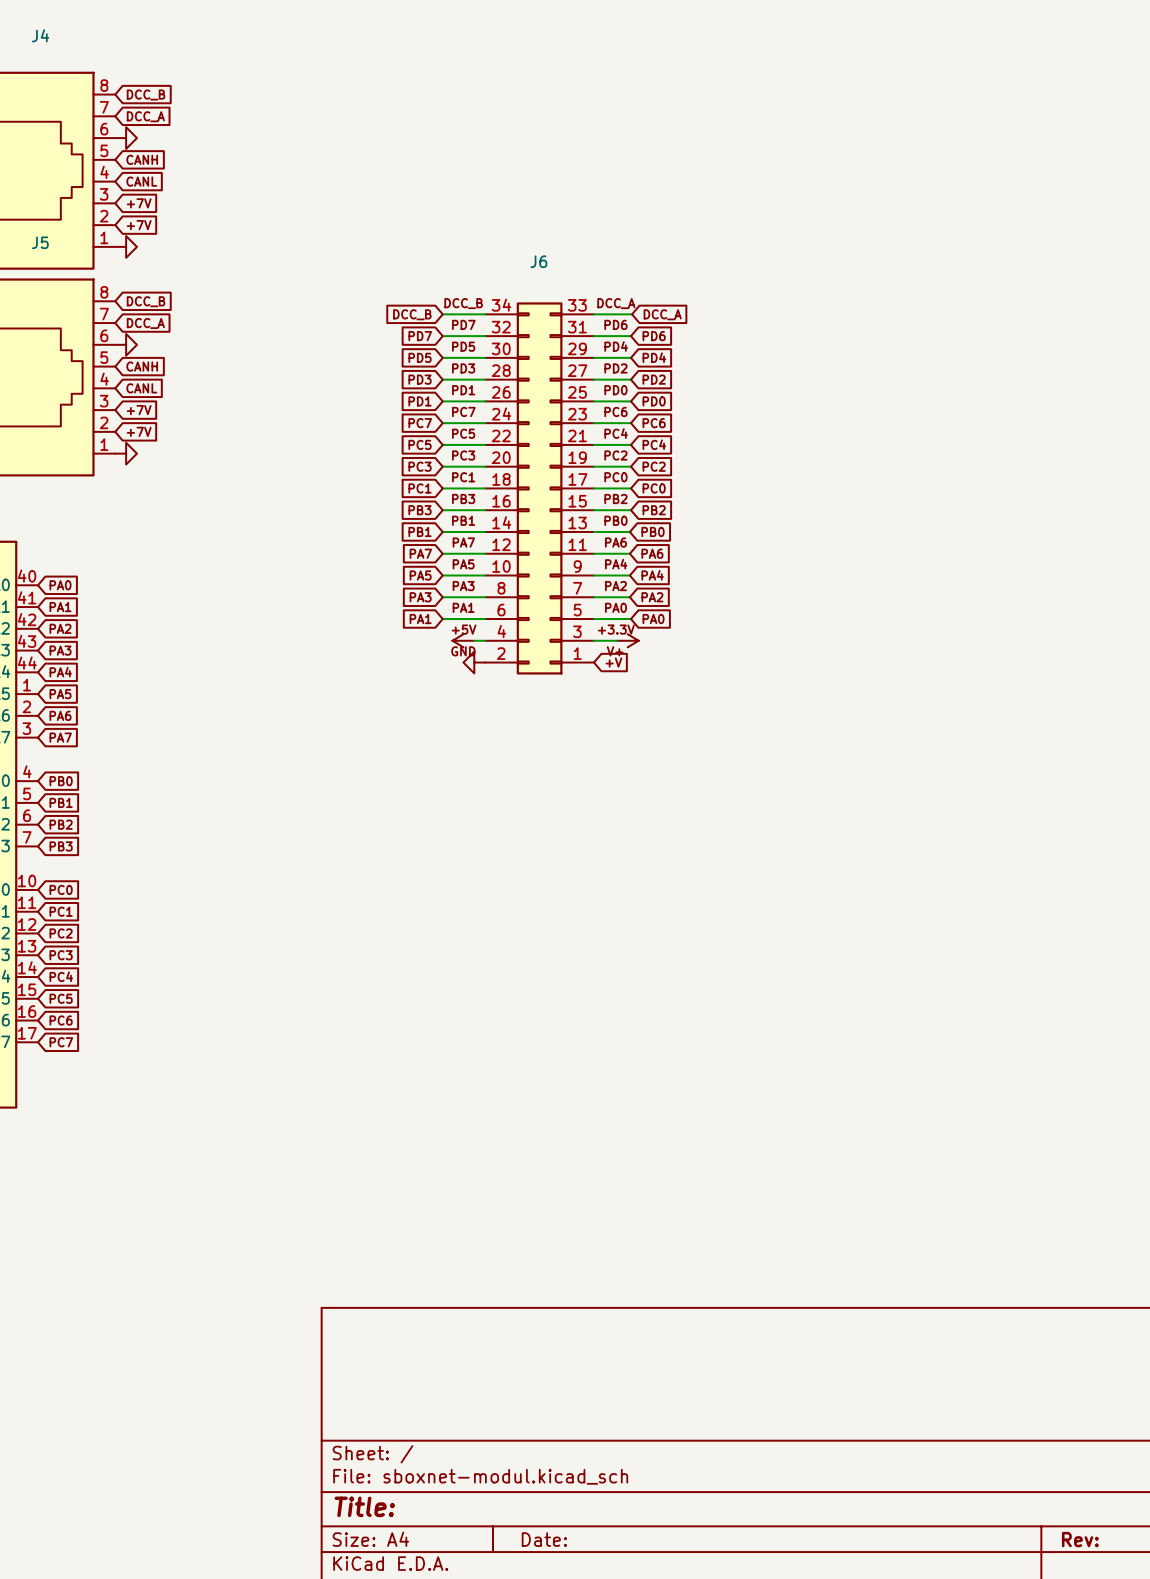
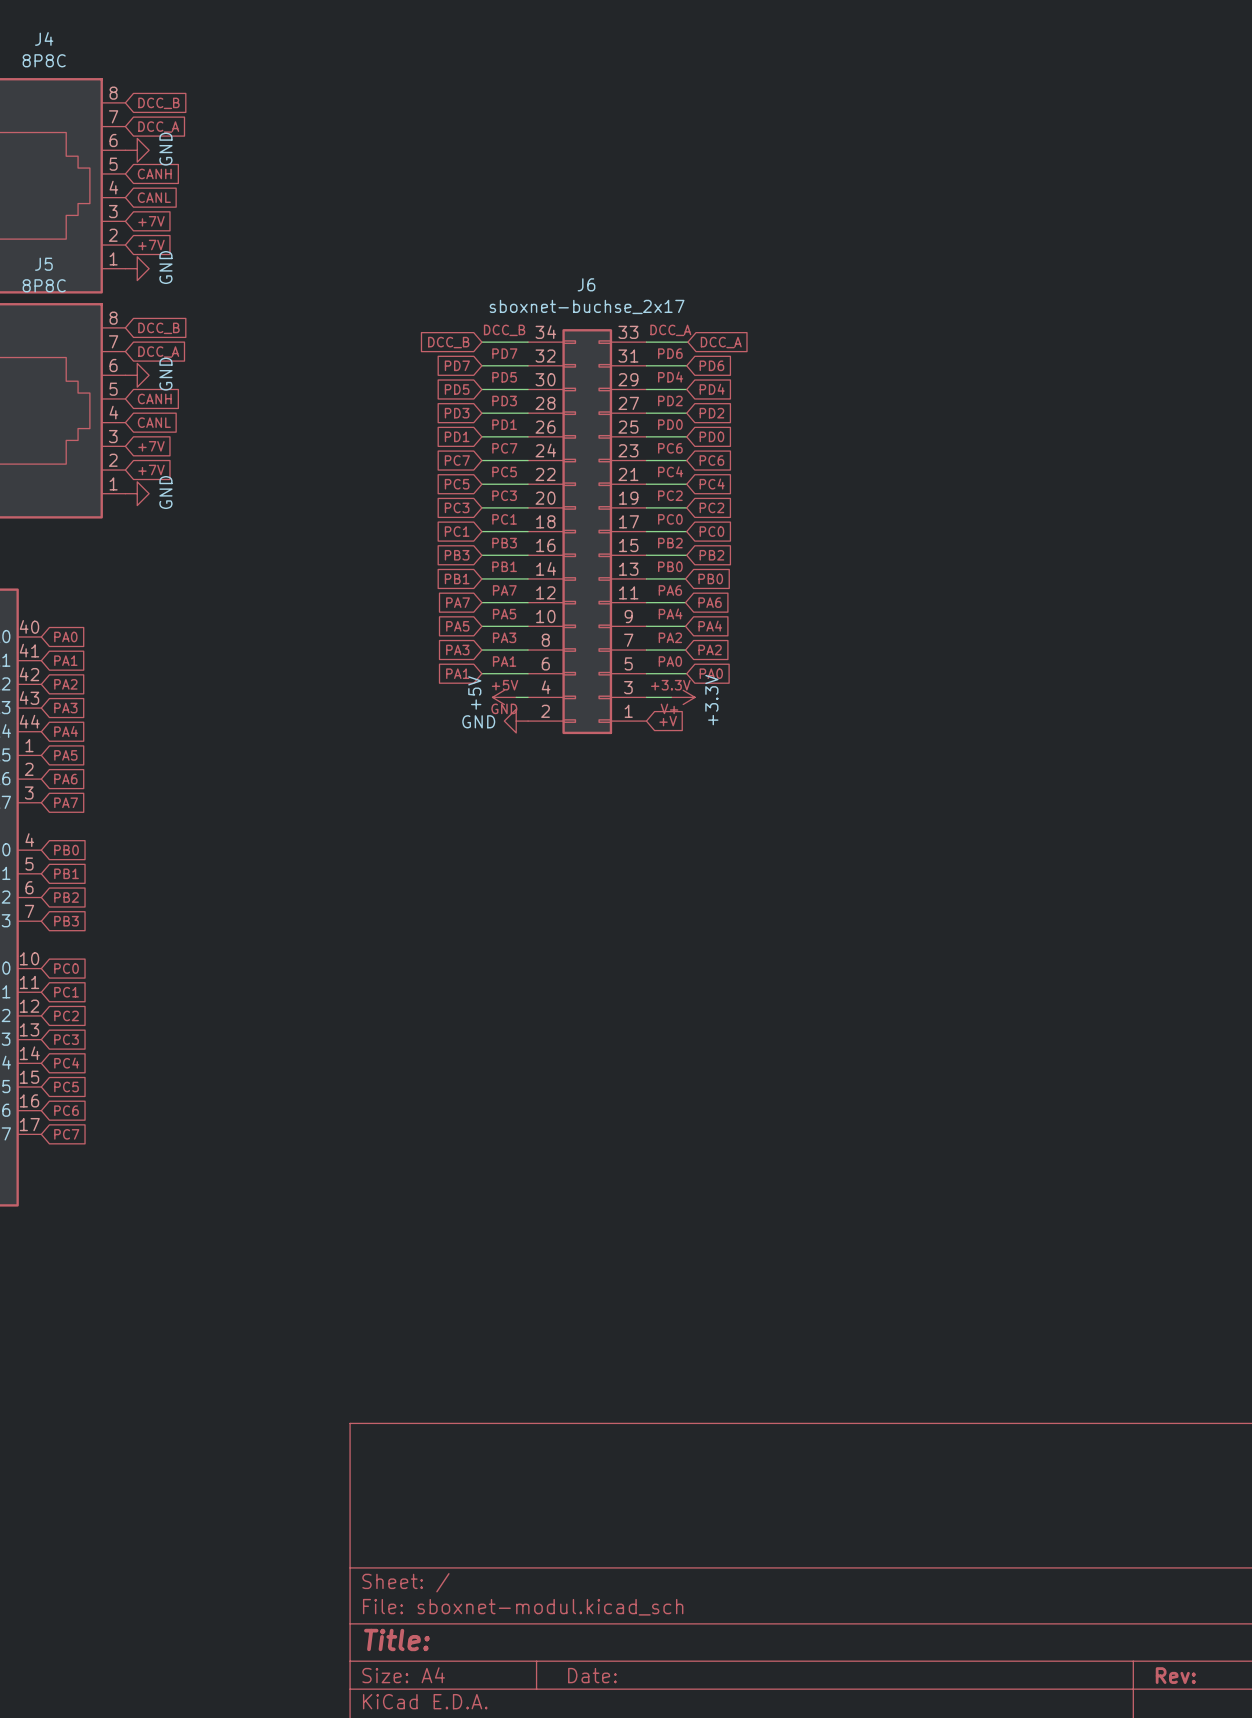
J4 value: none -> 8P8C (44, 60)
power symbol text: none -> GND (165, 149)
power symbol text: none -> GND (165, 267)
J5 value: none -> 8P8C (44, 285)
J6 value: none -> sboxnet-buchse_2x17 (587, 306)
power symbol text: none -> GND (165, 374)
power symbol text: none -> GND (165, 492)
power symbol text: none -> +5V (474, 692)
power symbol text: none -> +3.3V (711, 700)
power symbol text: none -> GND (478, 721)

